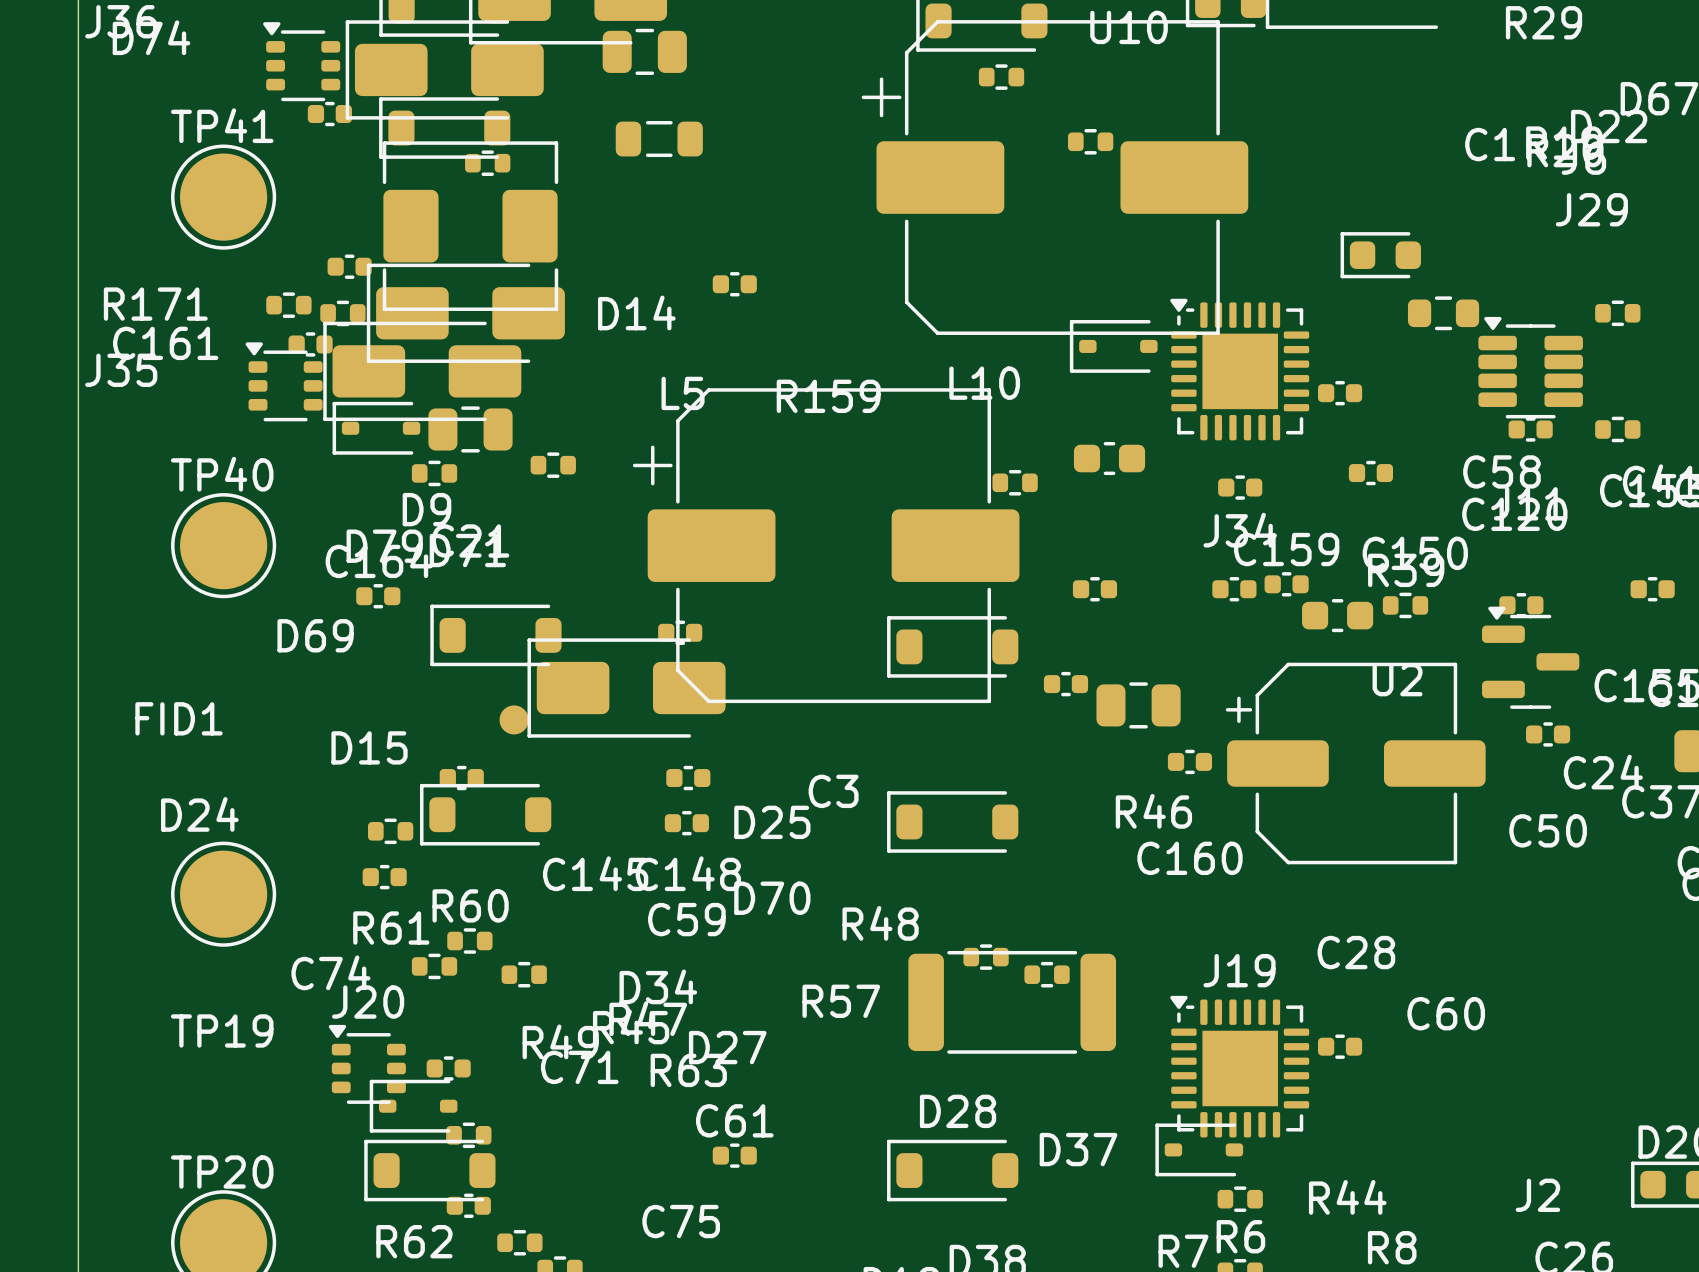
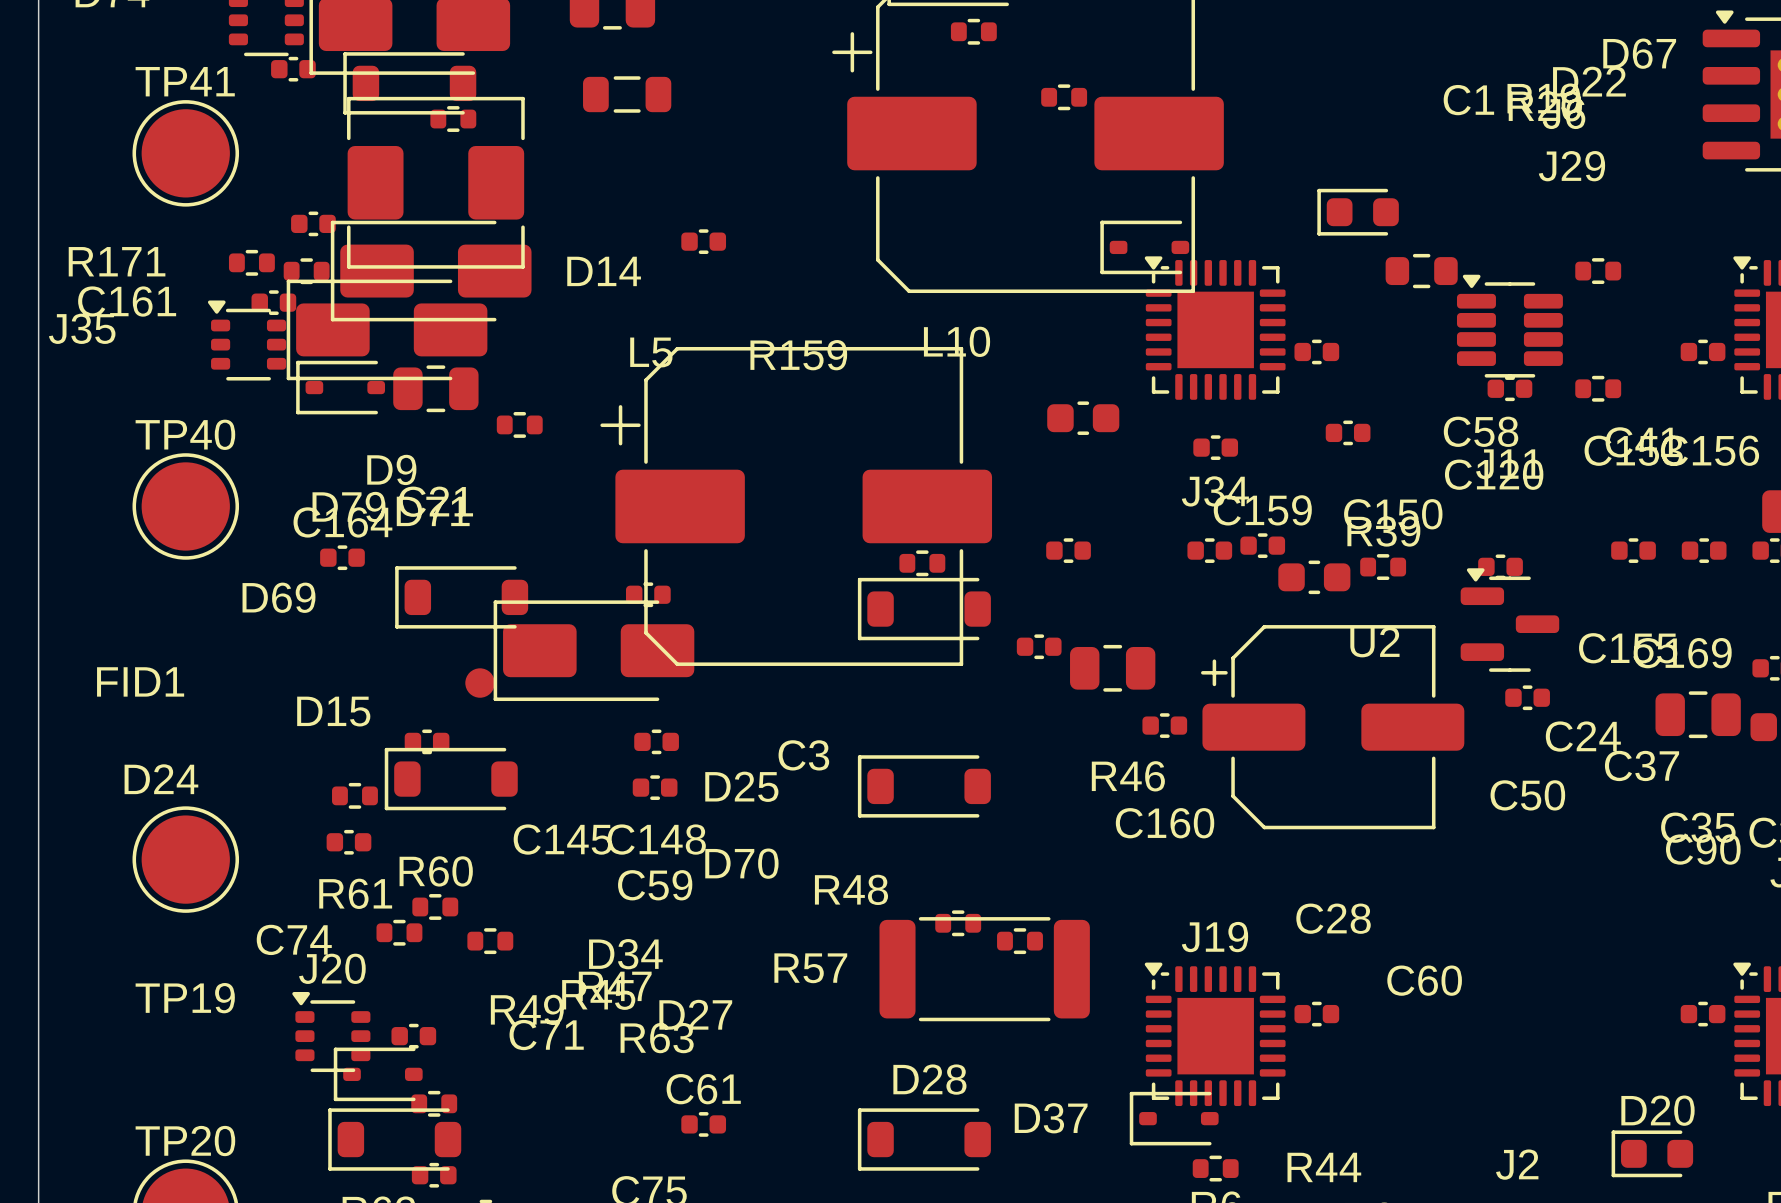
part position: (1113, 346) -> (1144, 247)
part: (434, 473) -> none
part position: (1015, 482) -> (922, 563)

